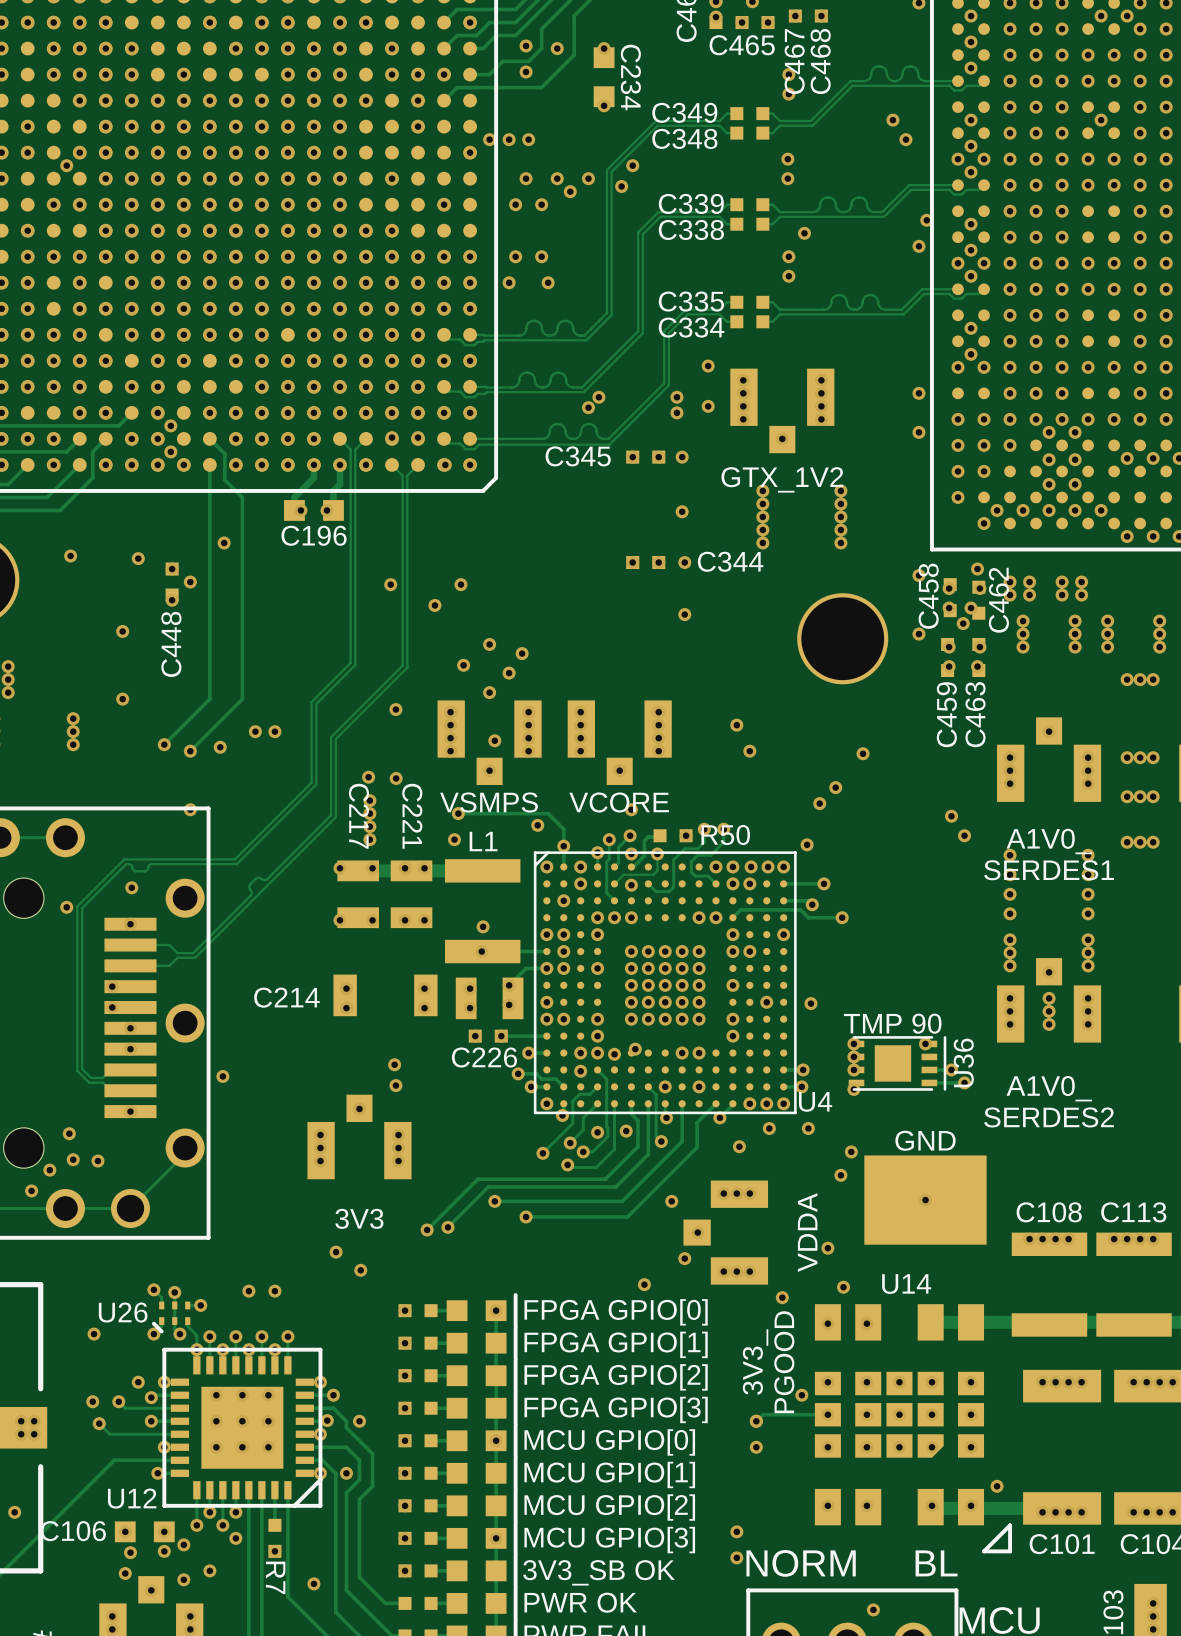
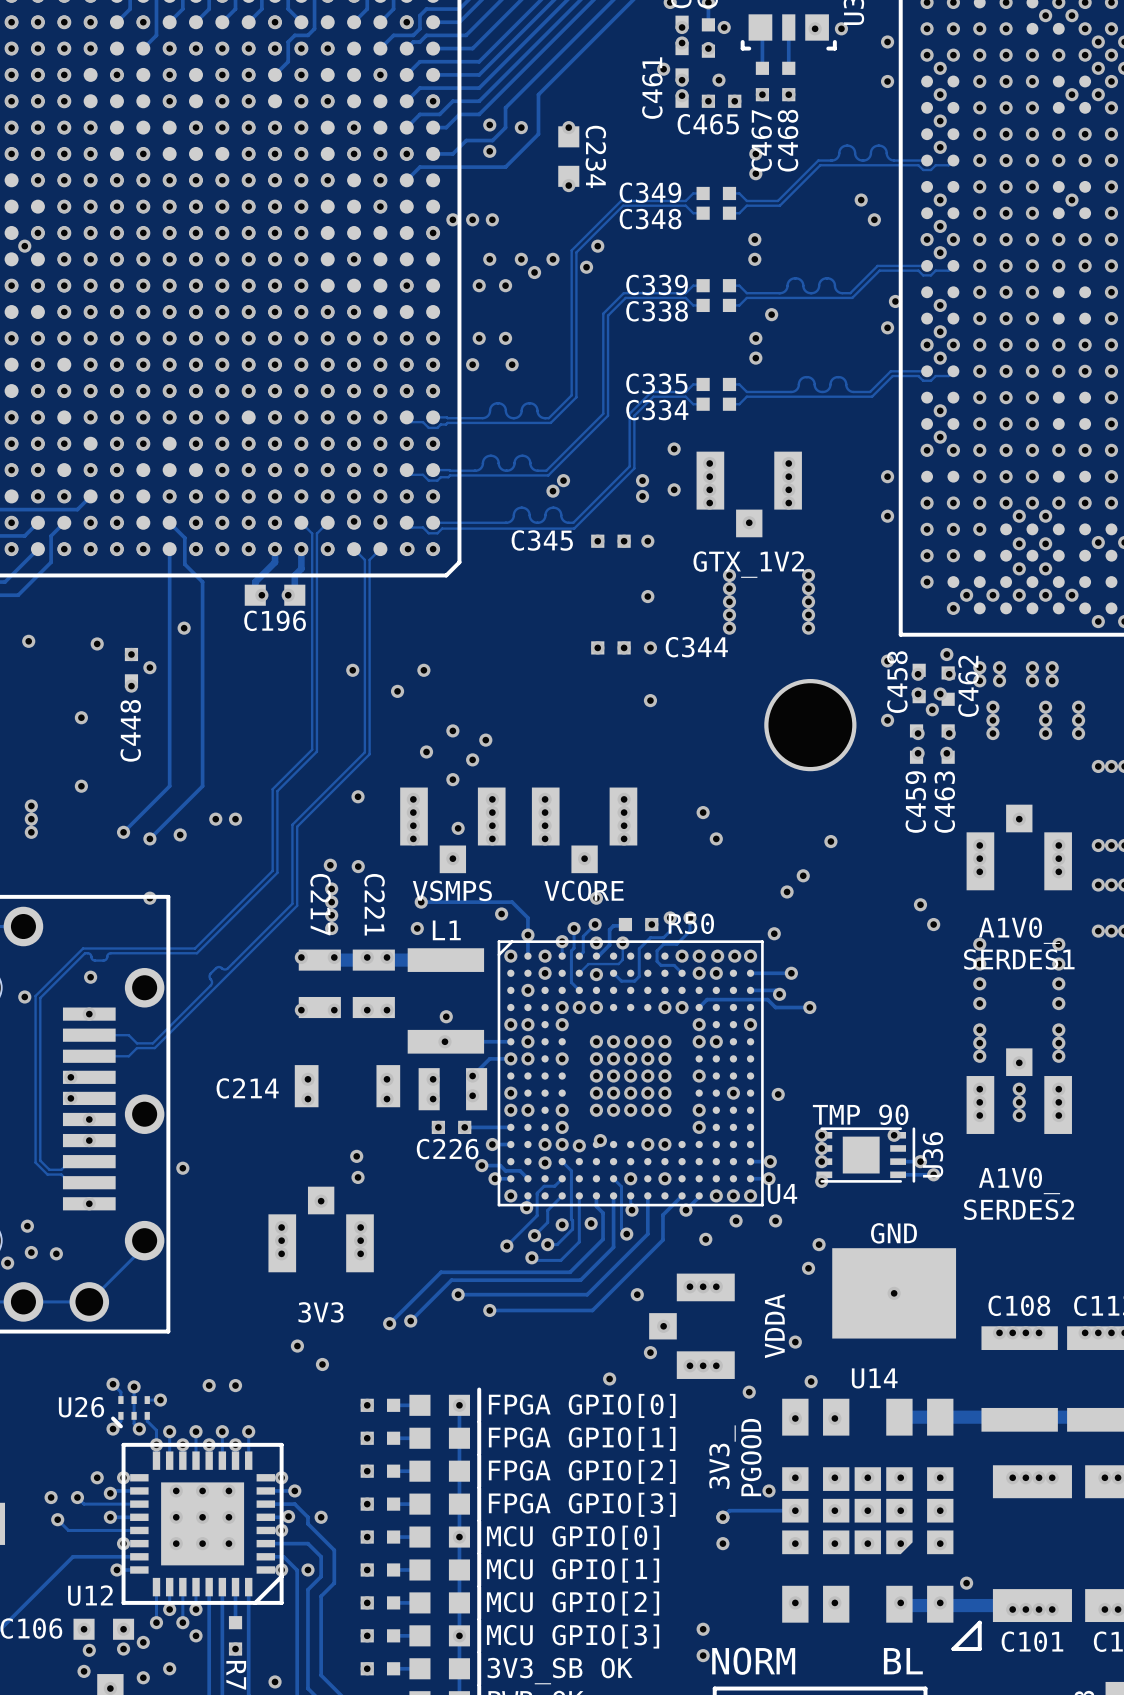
via: (170, 425) -> none
via: (170, 451) -> none
via: (94, 1334) -> none

